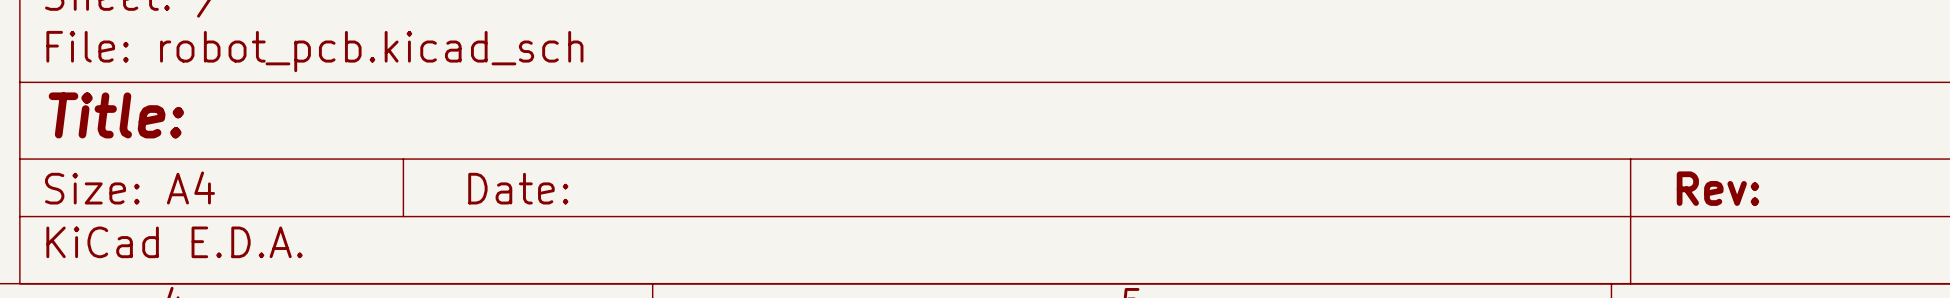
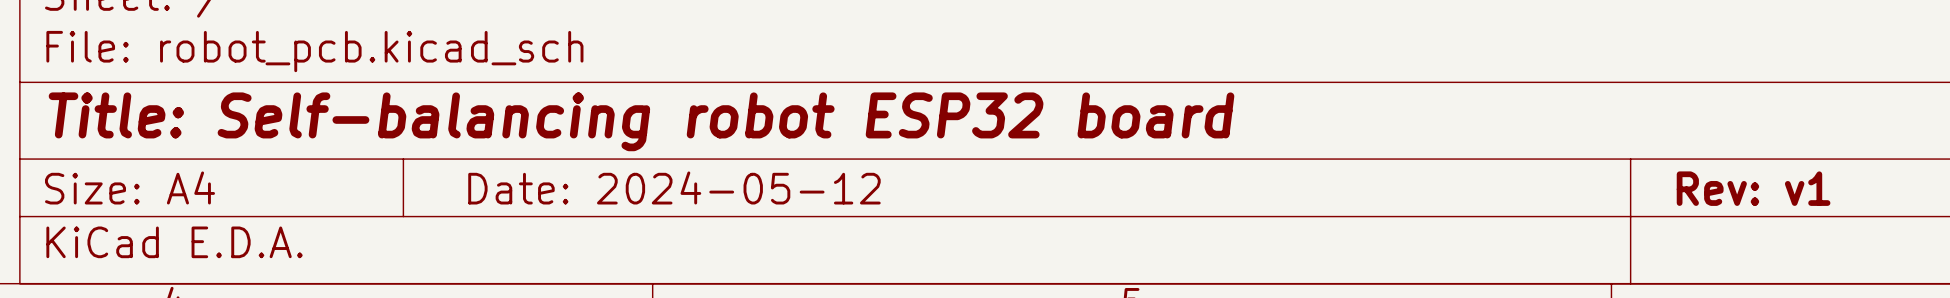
title block: Title: (116, 115) -> Title: Self-balancing robot ESP32 board (641, 121)
title block: Date: (518, 188) -> Date: 2024-05-12 (674, 187)
title block: Rev: (1717, 188) -> Rev: v1 (1753, 188)

